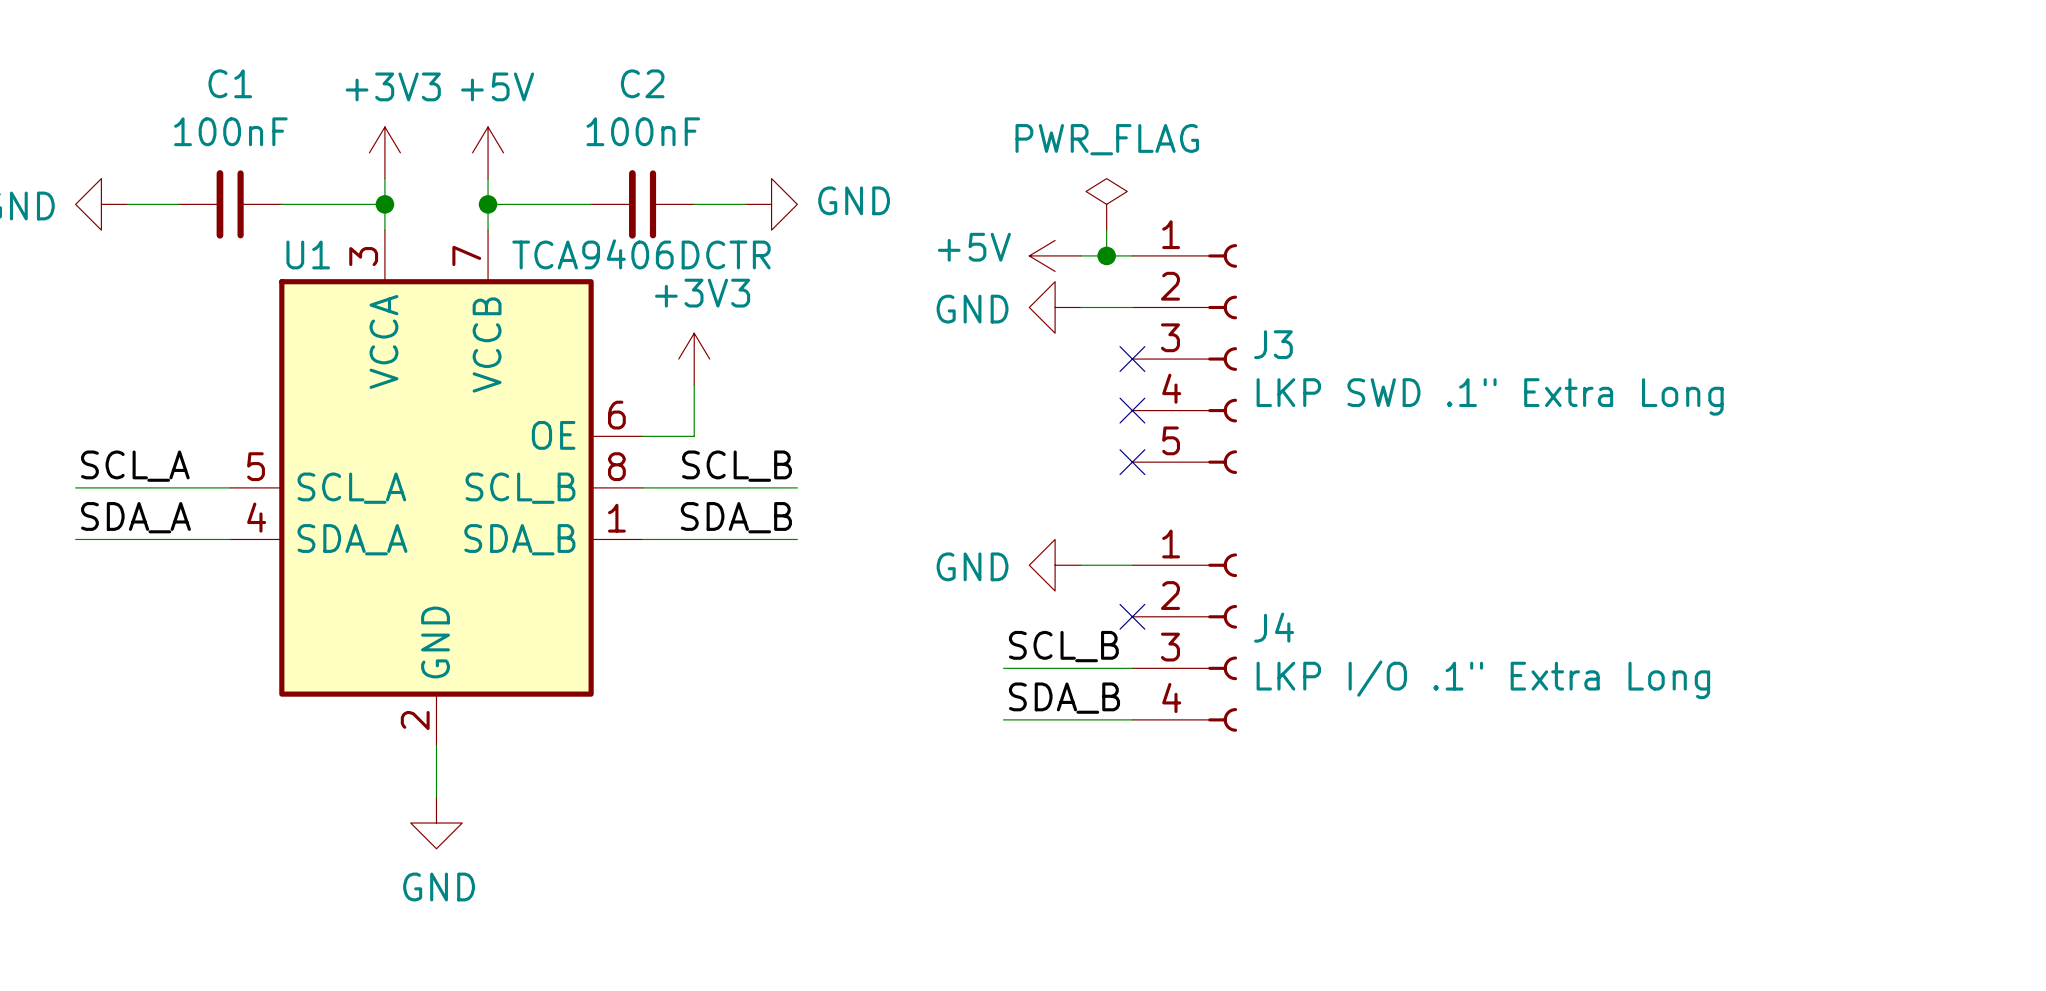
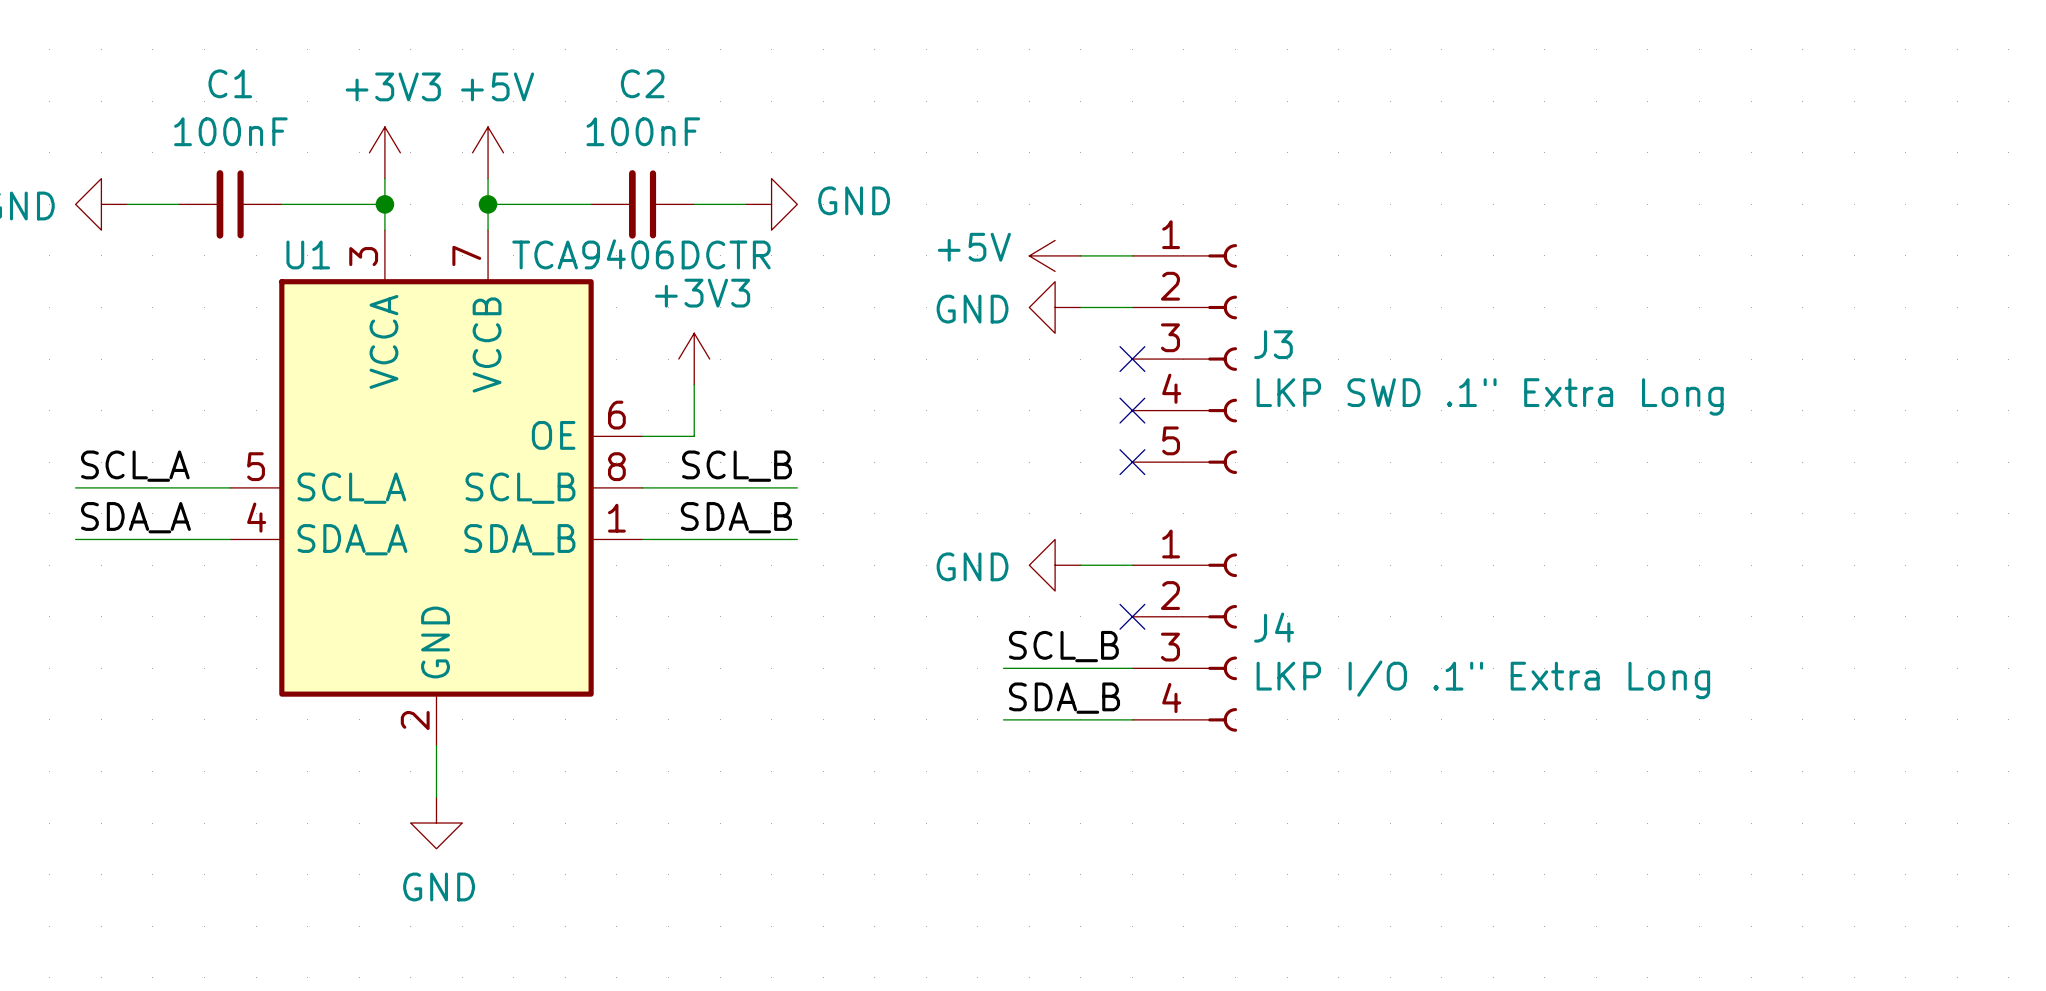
power symbol: PWR_FLAG (1106, 204) -> none
wire: (1106, 230) (1106, 255) -> none
junction: (1106, 255) -> none

